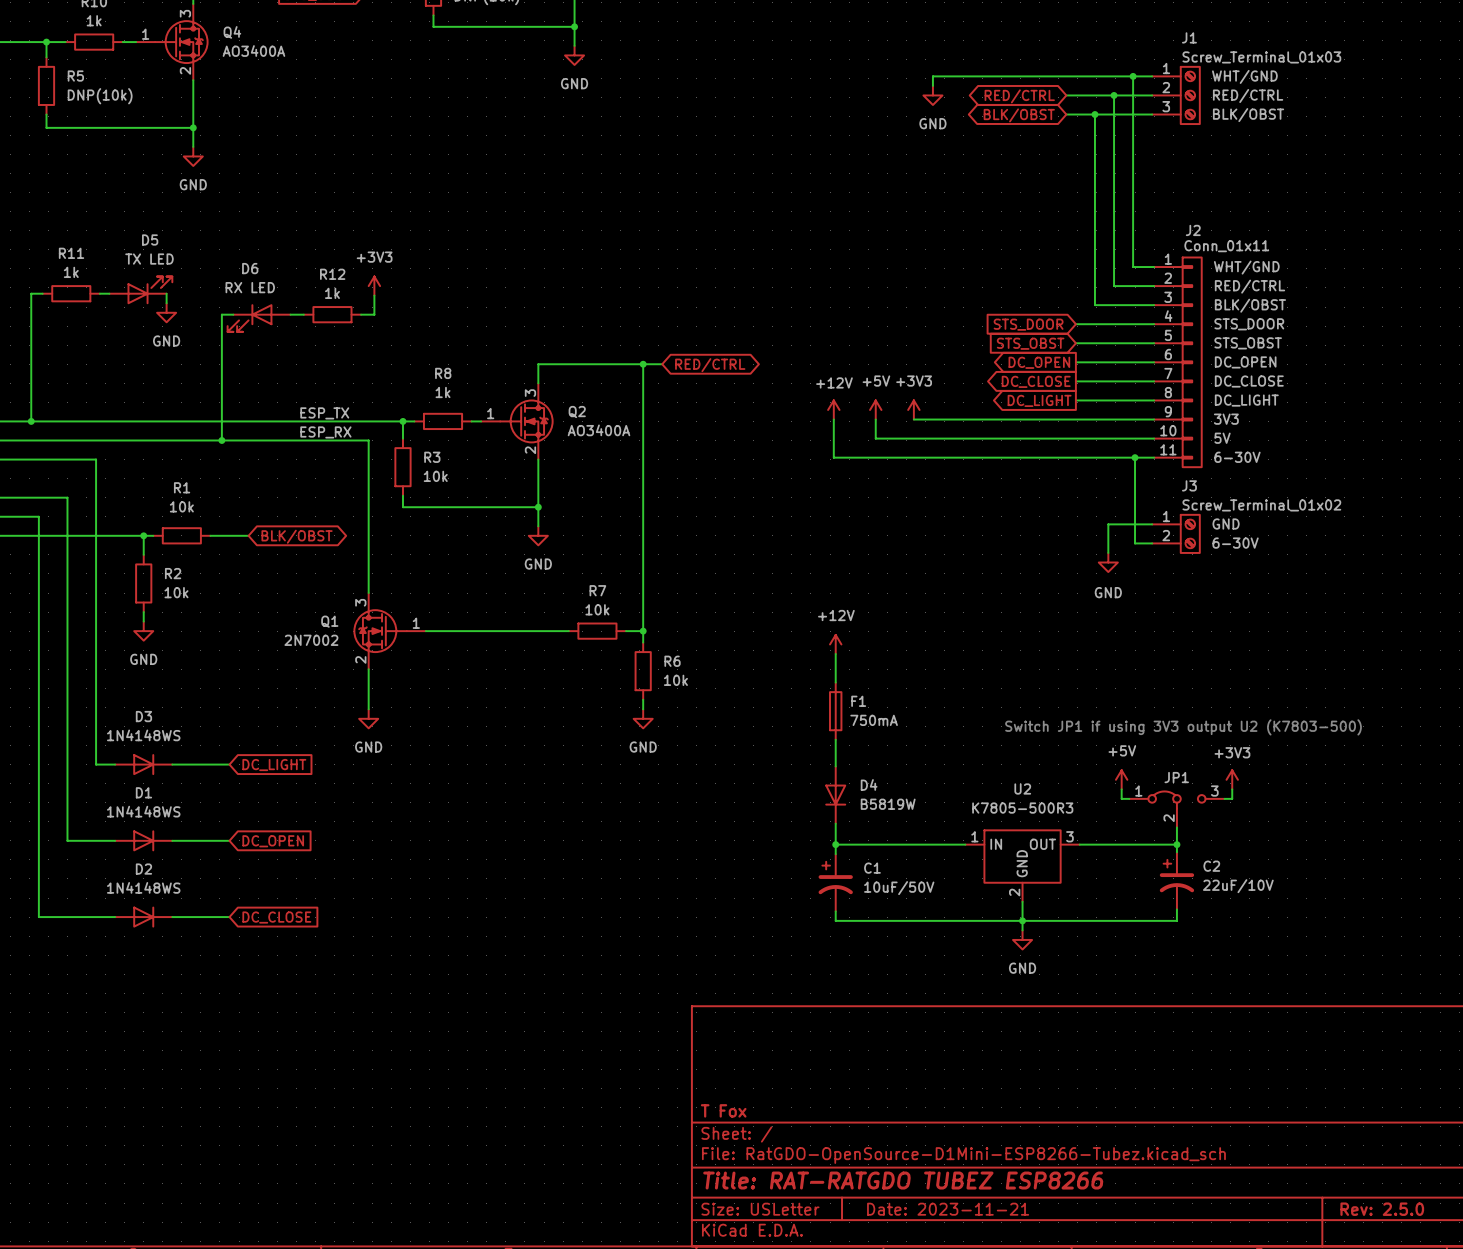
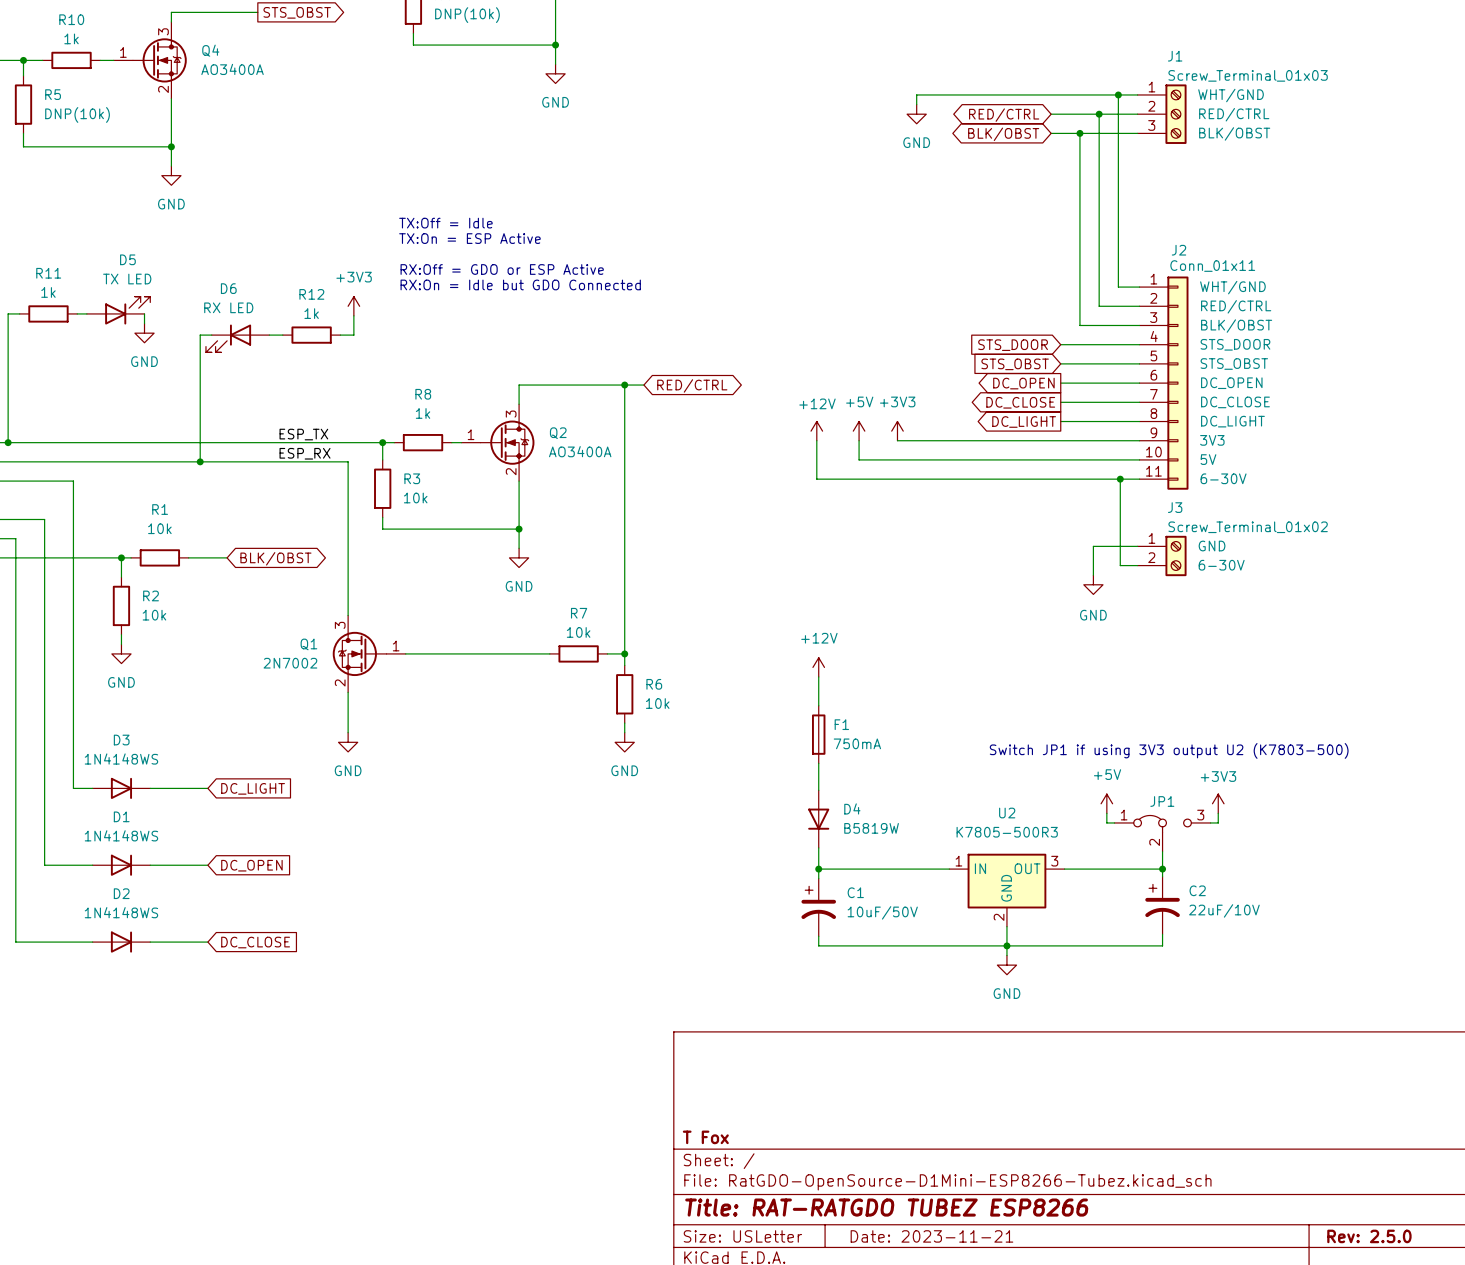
text: none -> TX:Off = Idle (445, 223)
text: none -> TX:On = ESP Active (469, 238)
text: none -> RX:Off = GDO or ESP Active (502, 269)
text: none -> RX:On = Idle but GDO Connected (520, 284)

